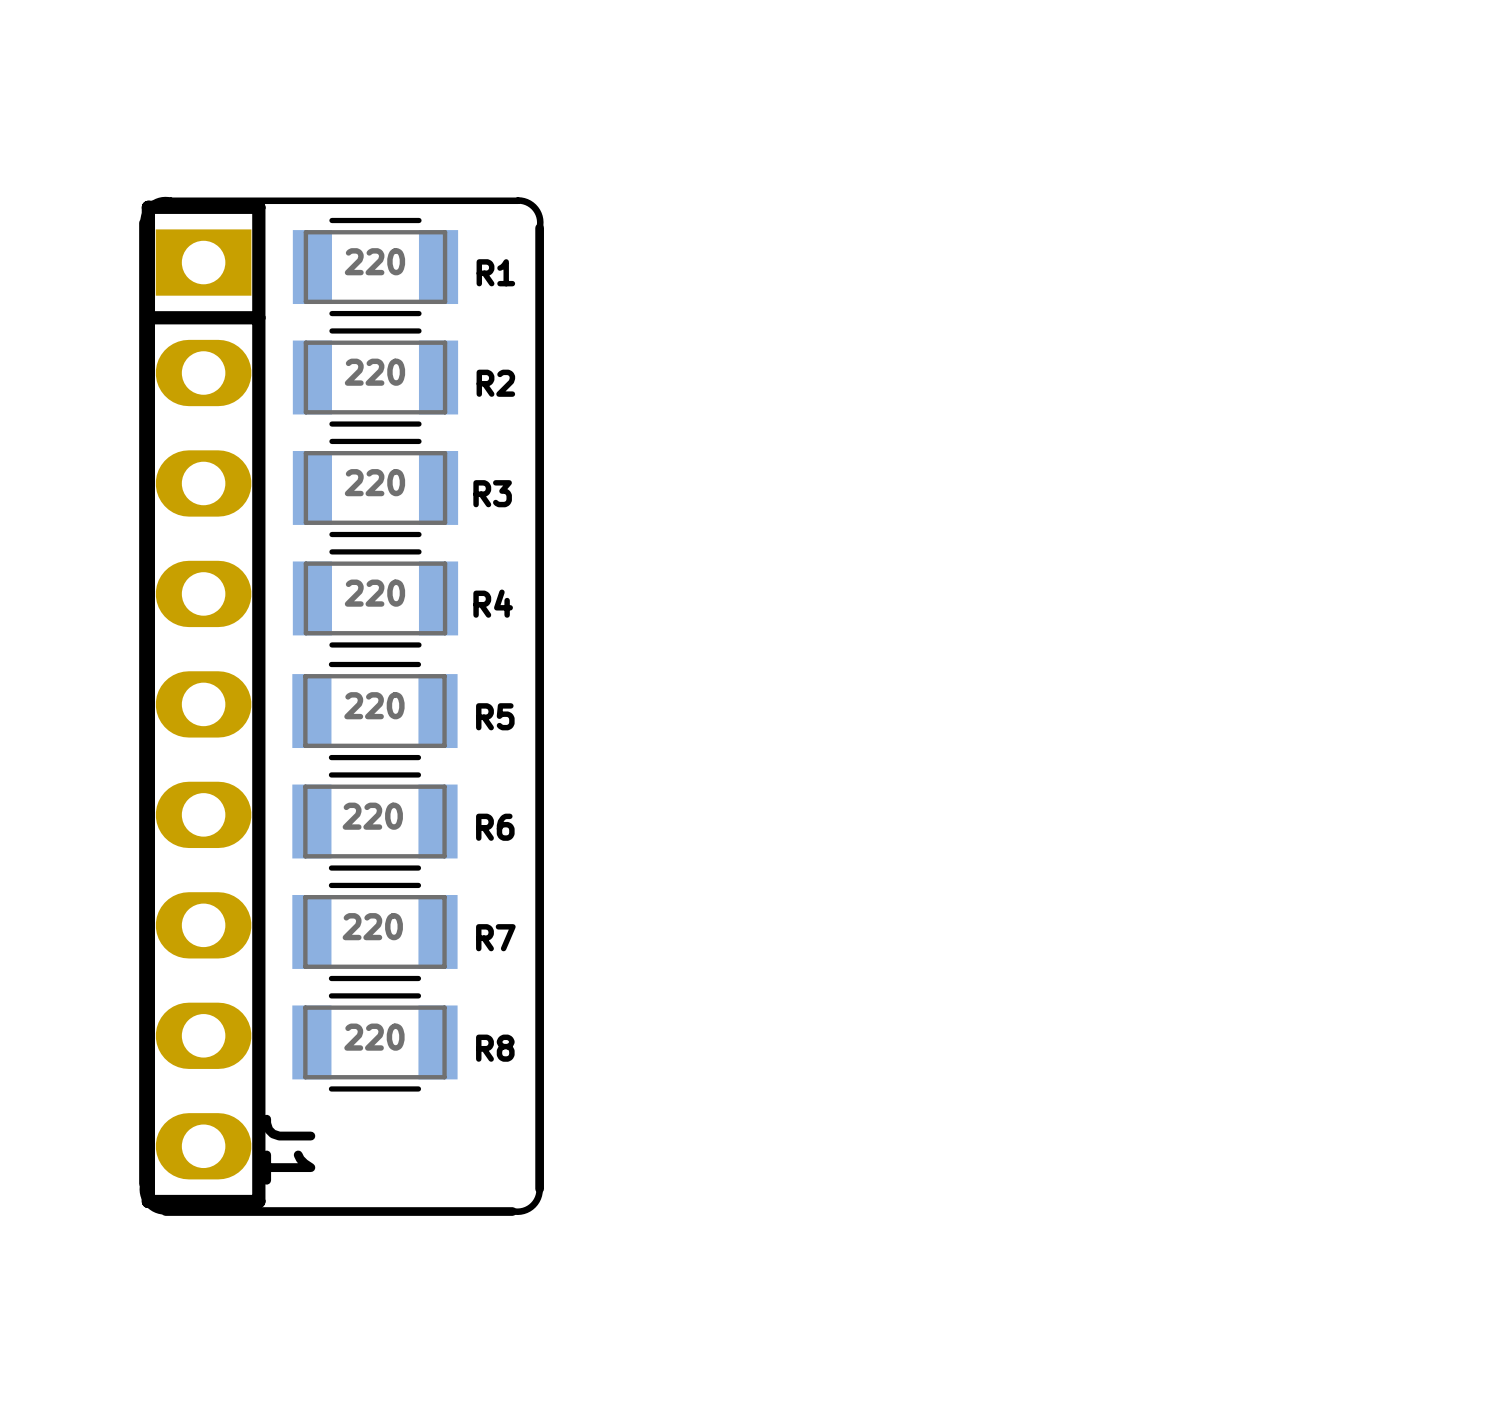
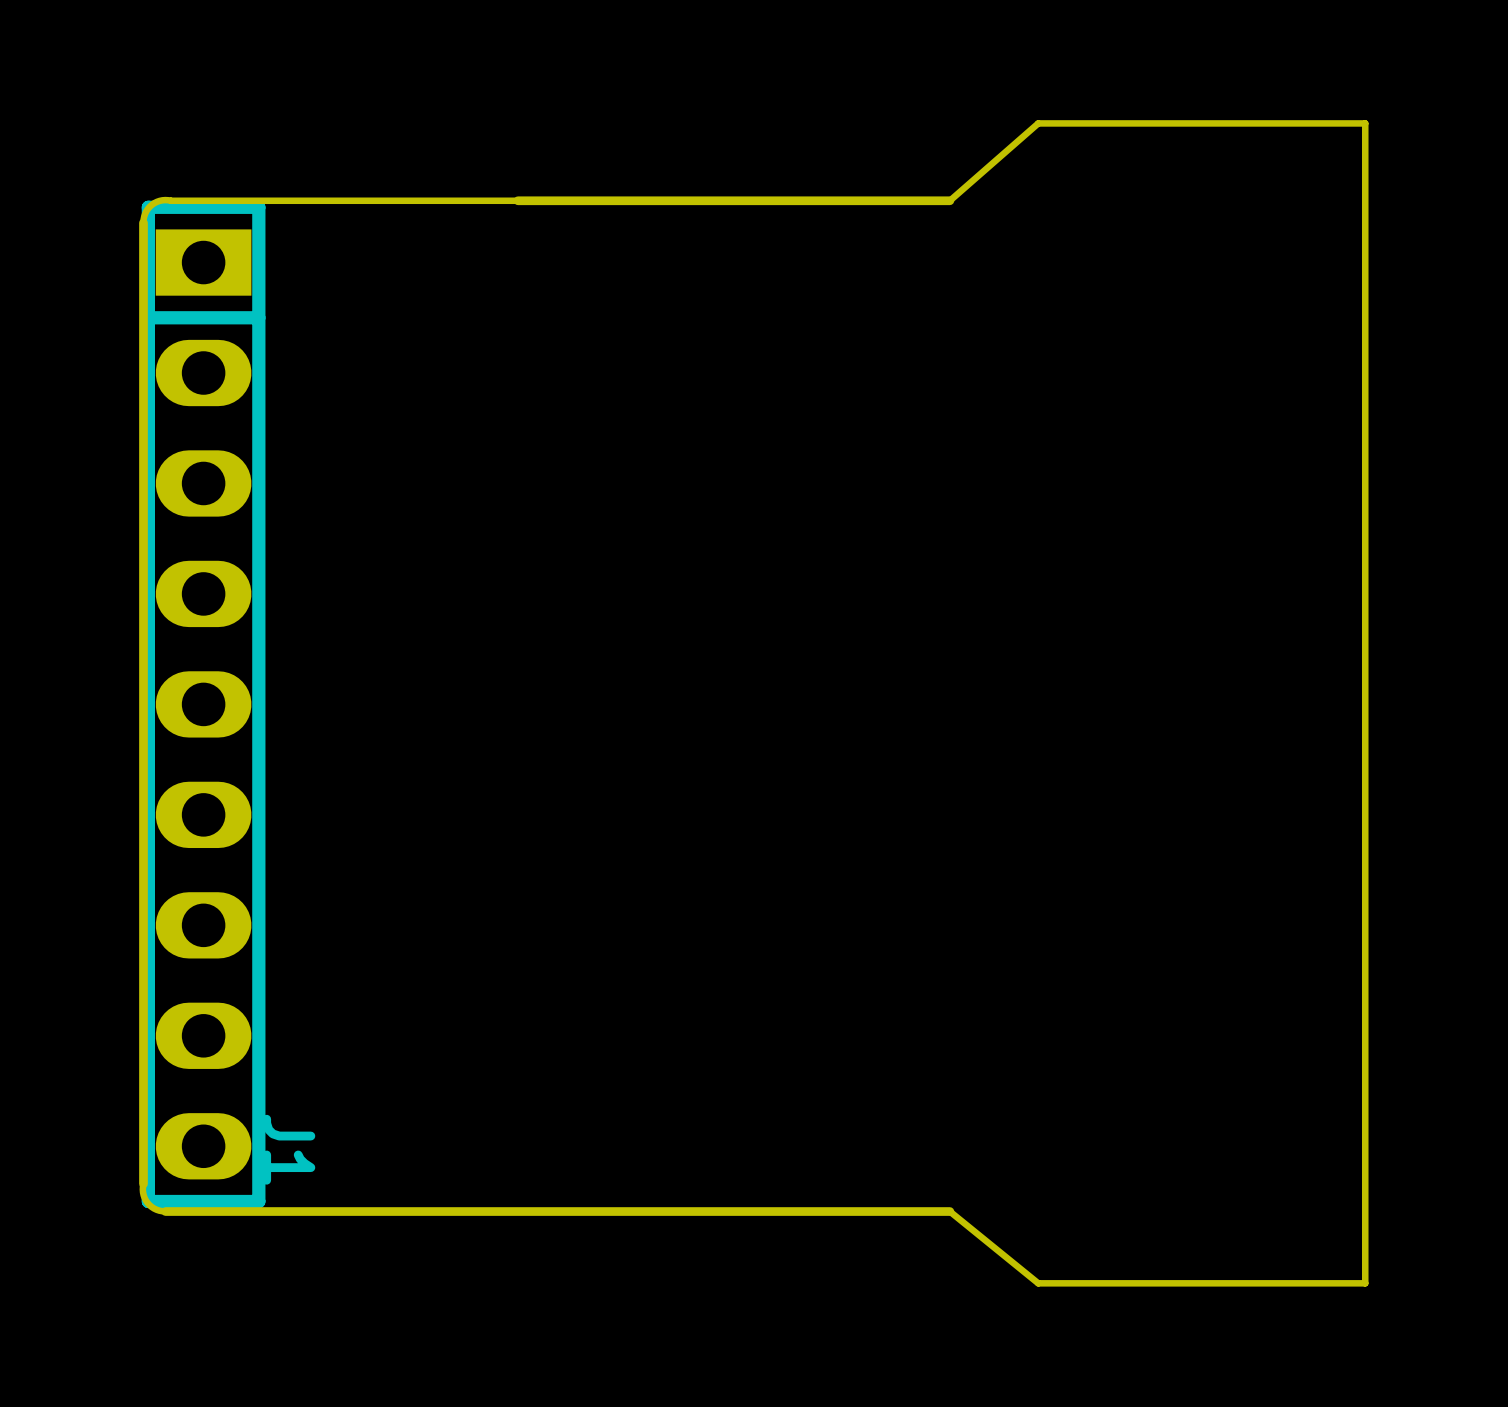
board edge: (518, 200) (526, 202) (533, 206) (538, 213) (540, 222) (539, 1188) -> (517, 200) (949, 200) (1038, 123) (1365, 123) (1365, 1283) (1038, 1283) (949, 1211) (512, 1211)
R1: 220 (375, 267) -> none
R2: 220 (375, 377) -> none
R3: 220 (375, 487) -> none
R4: 220 (375, 598) -> none
R5: 220 (374, 711) -> none
R6: 220 (374, 821) -> none
R7: 220 (374, 931) -> none
R8: 220 (374, 1042) -> none
board edge: (539, 1189) (537, 1198) (531, 1207) (520, 1211) (512, 1211) -> none

